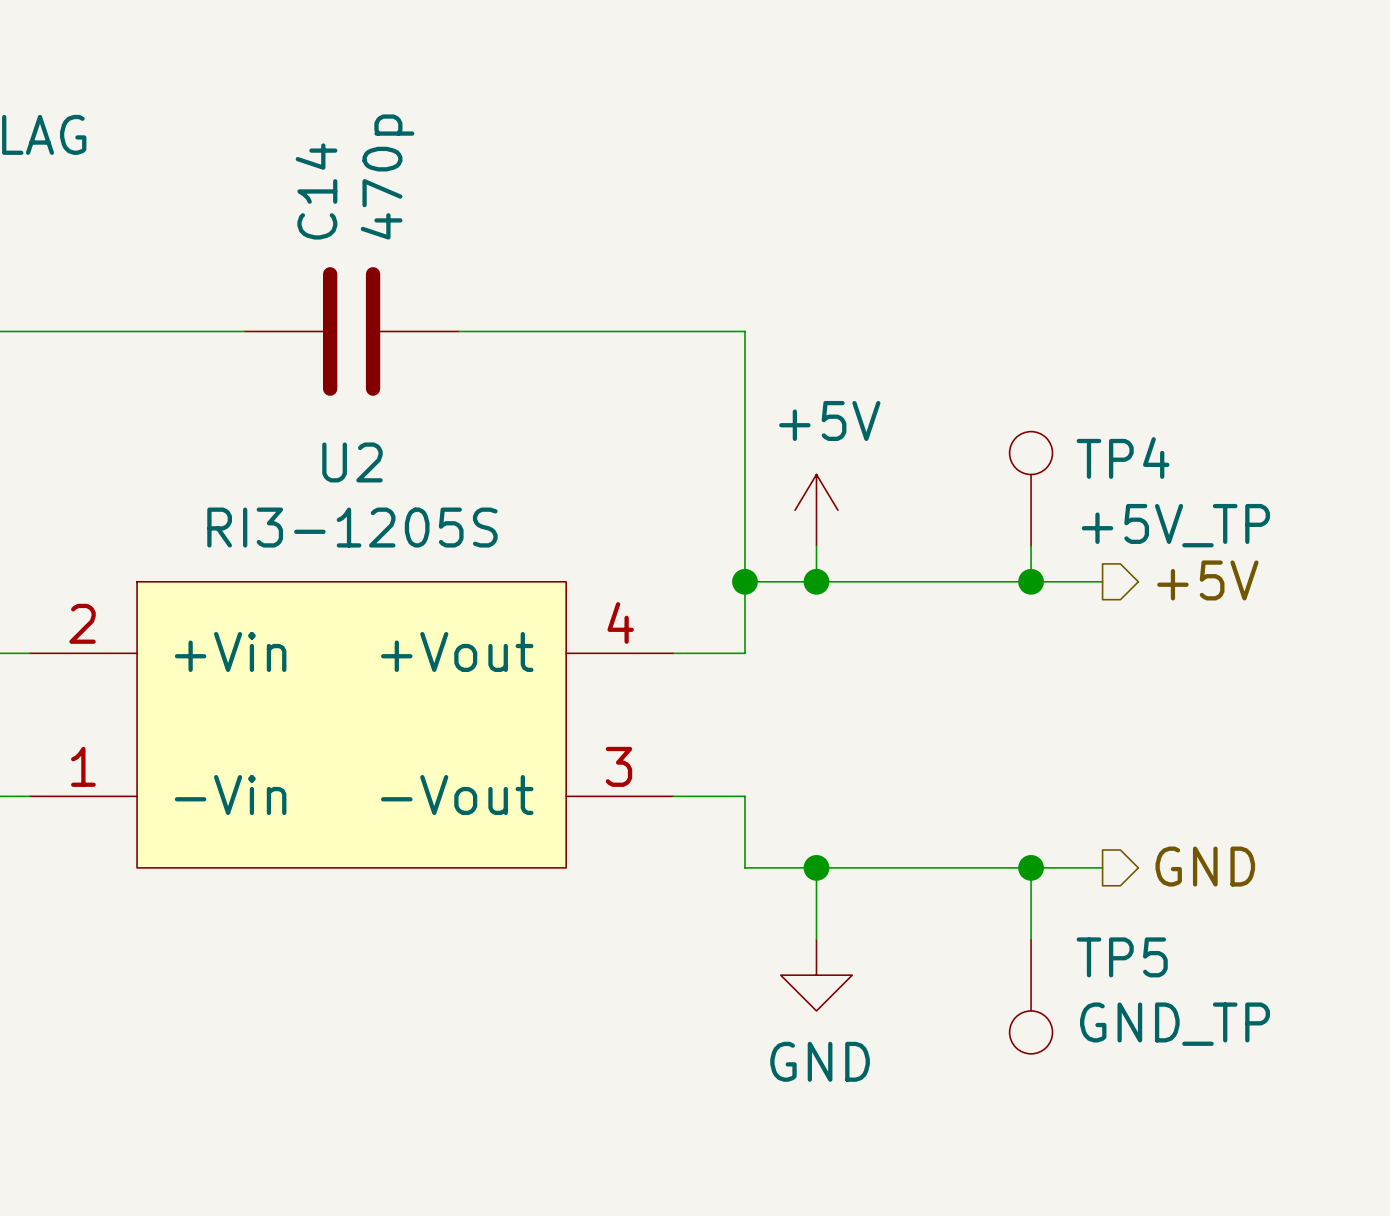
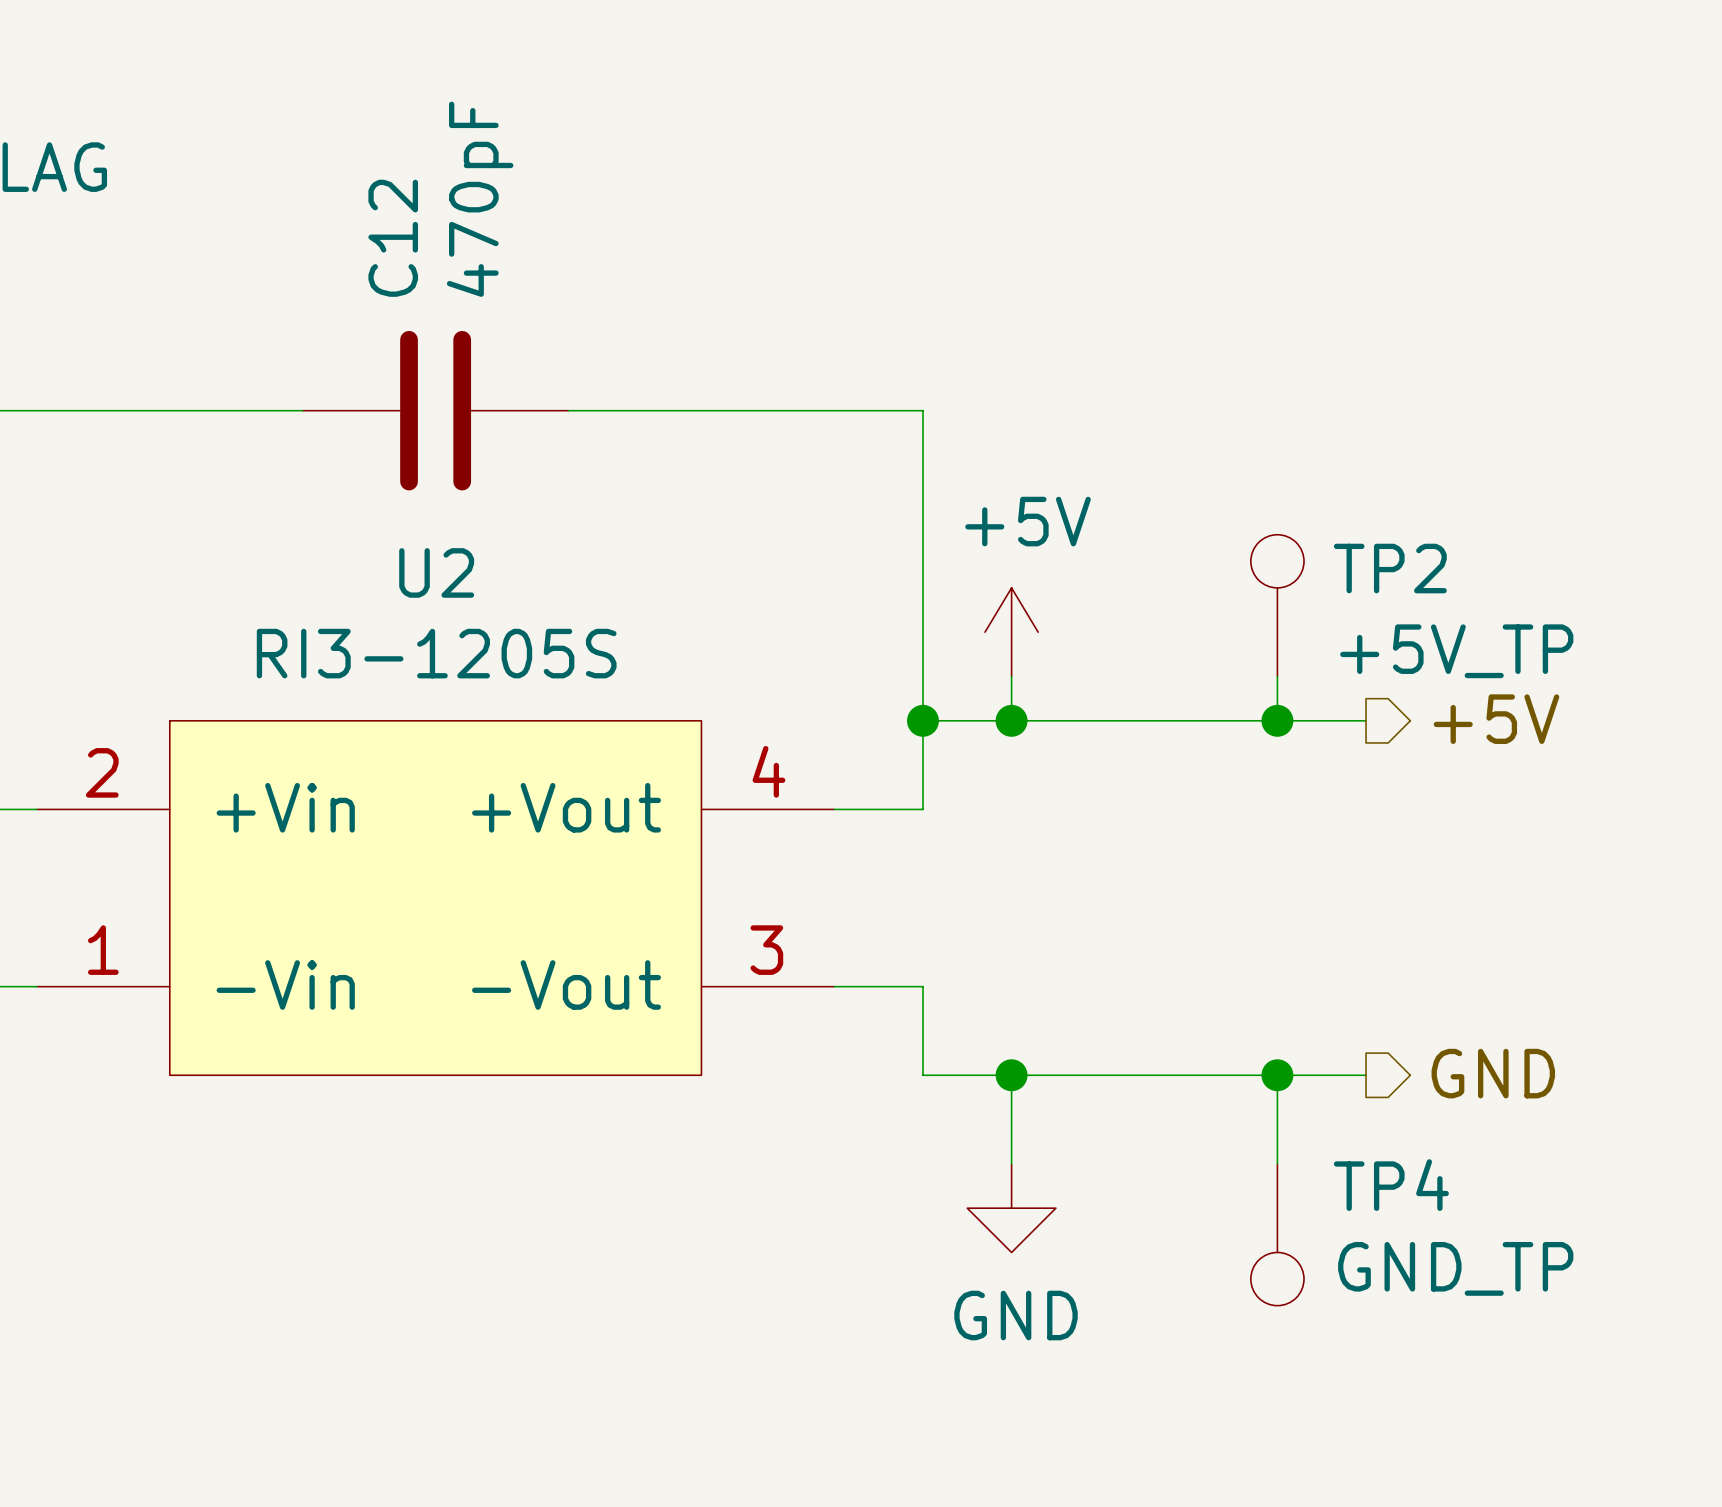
C14 value: 470p (387, 177) -> 470pF (480, 199)
C14 name: C14 (316, 191) -> C12 (393, 238)
TP4 name: TP4 (1123, 458) -> TP2 (1390, 568)
TP5 name: TP5 (1122, 957) -> TP4 (1391, 1185)

